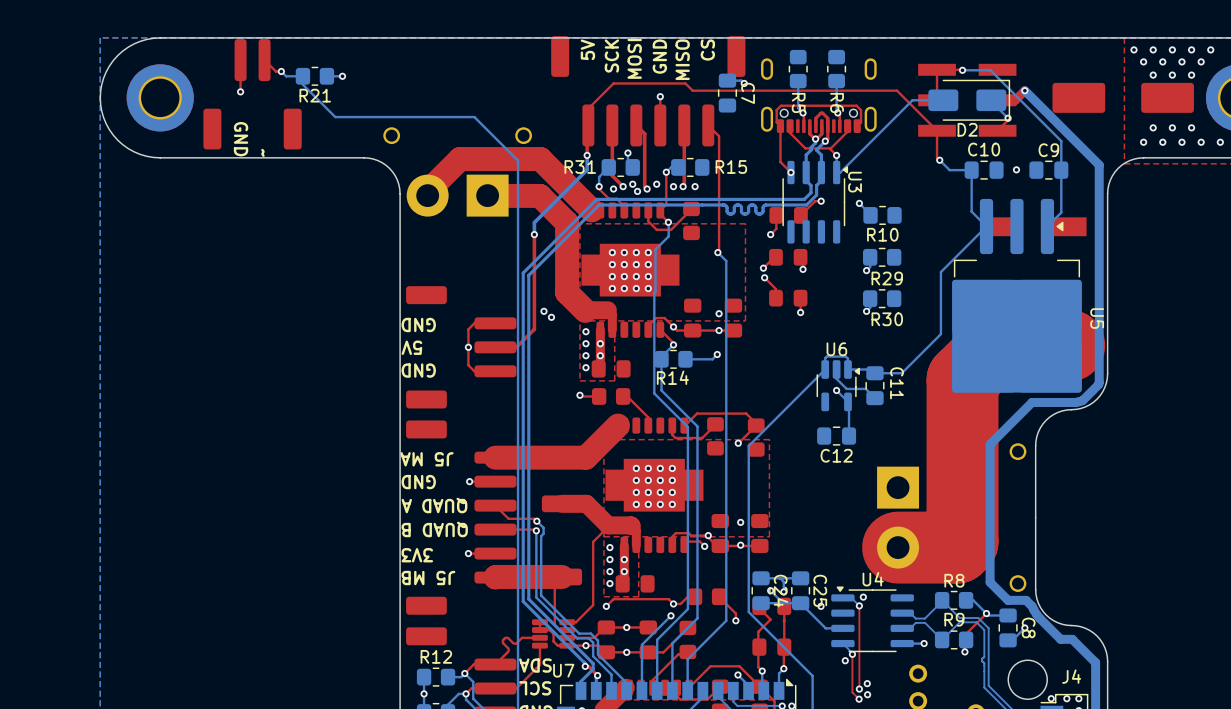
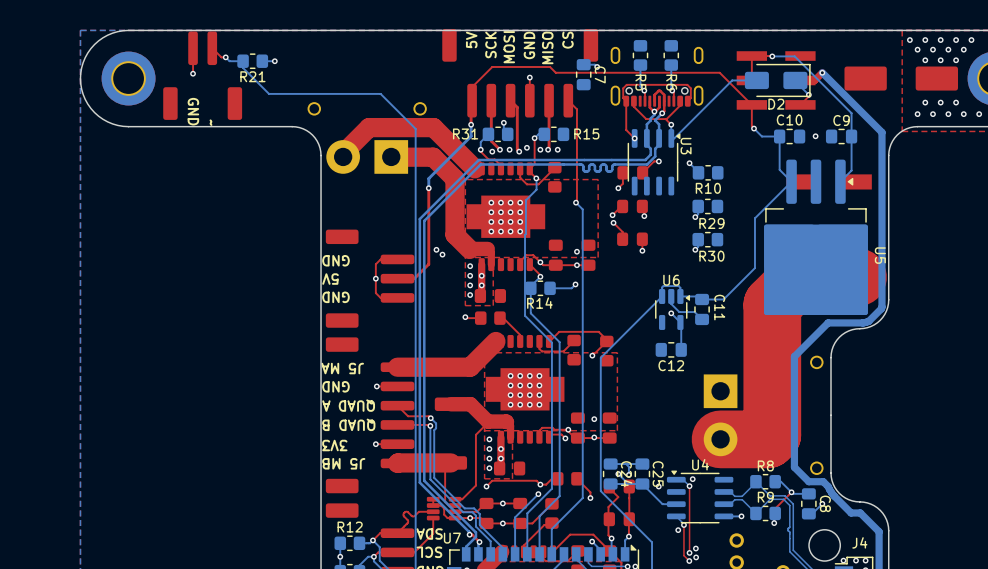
via: (632, 184) -> none
via: none -> (509, 149)
via: (637, 191) -> none

